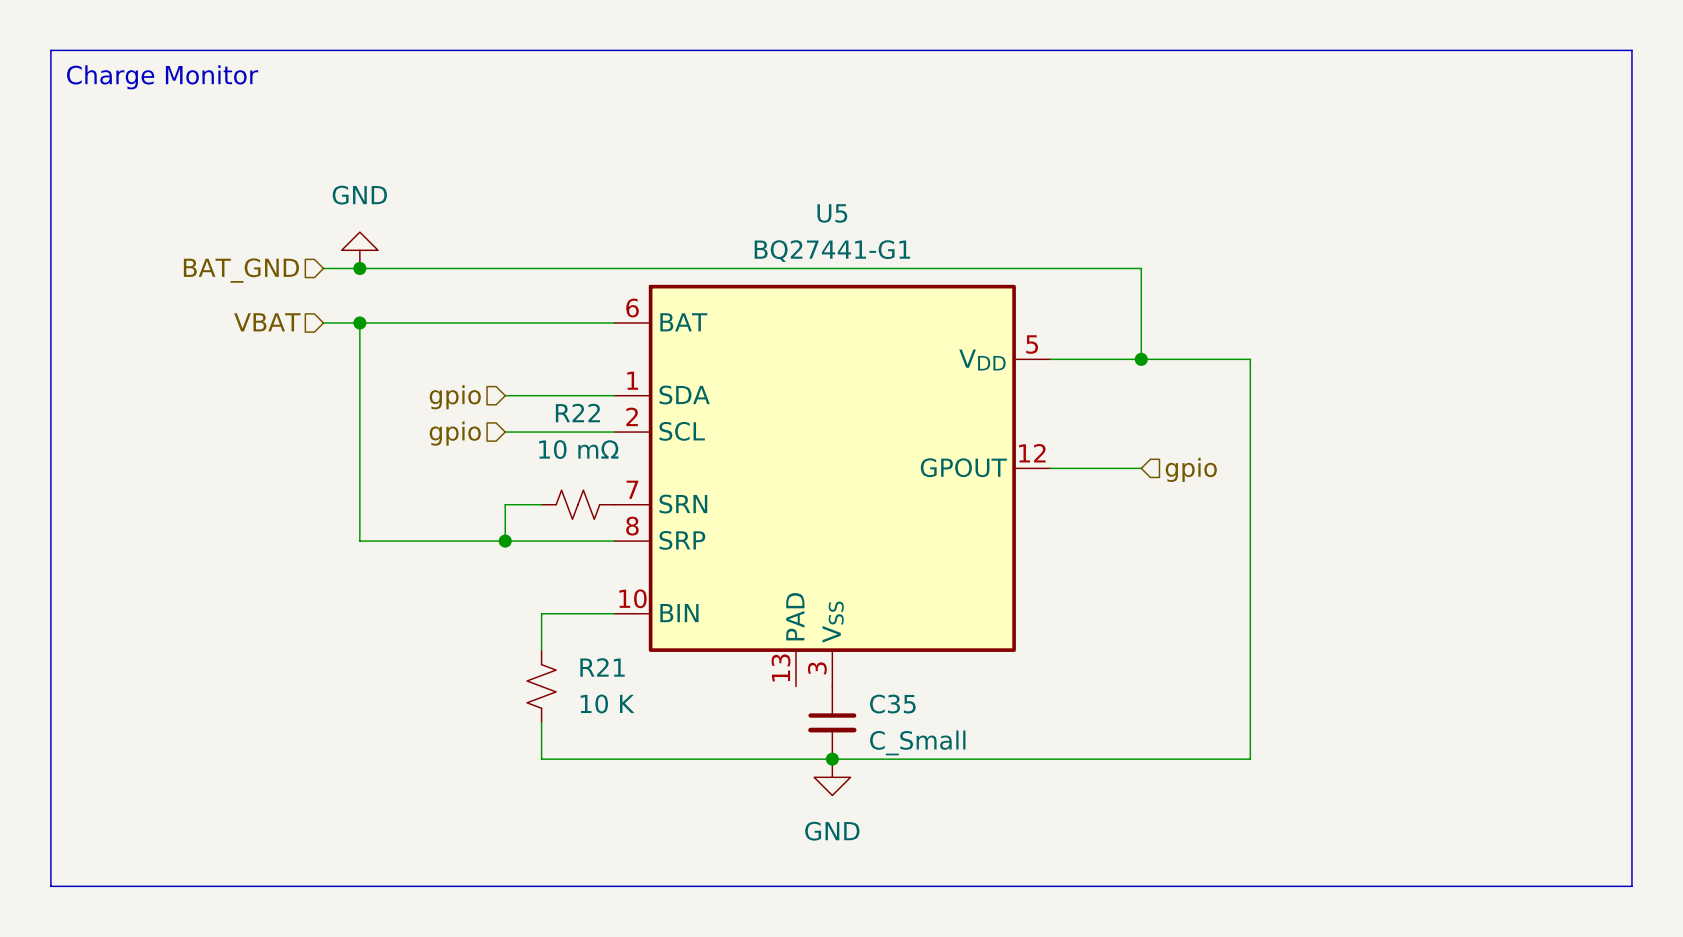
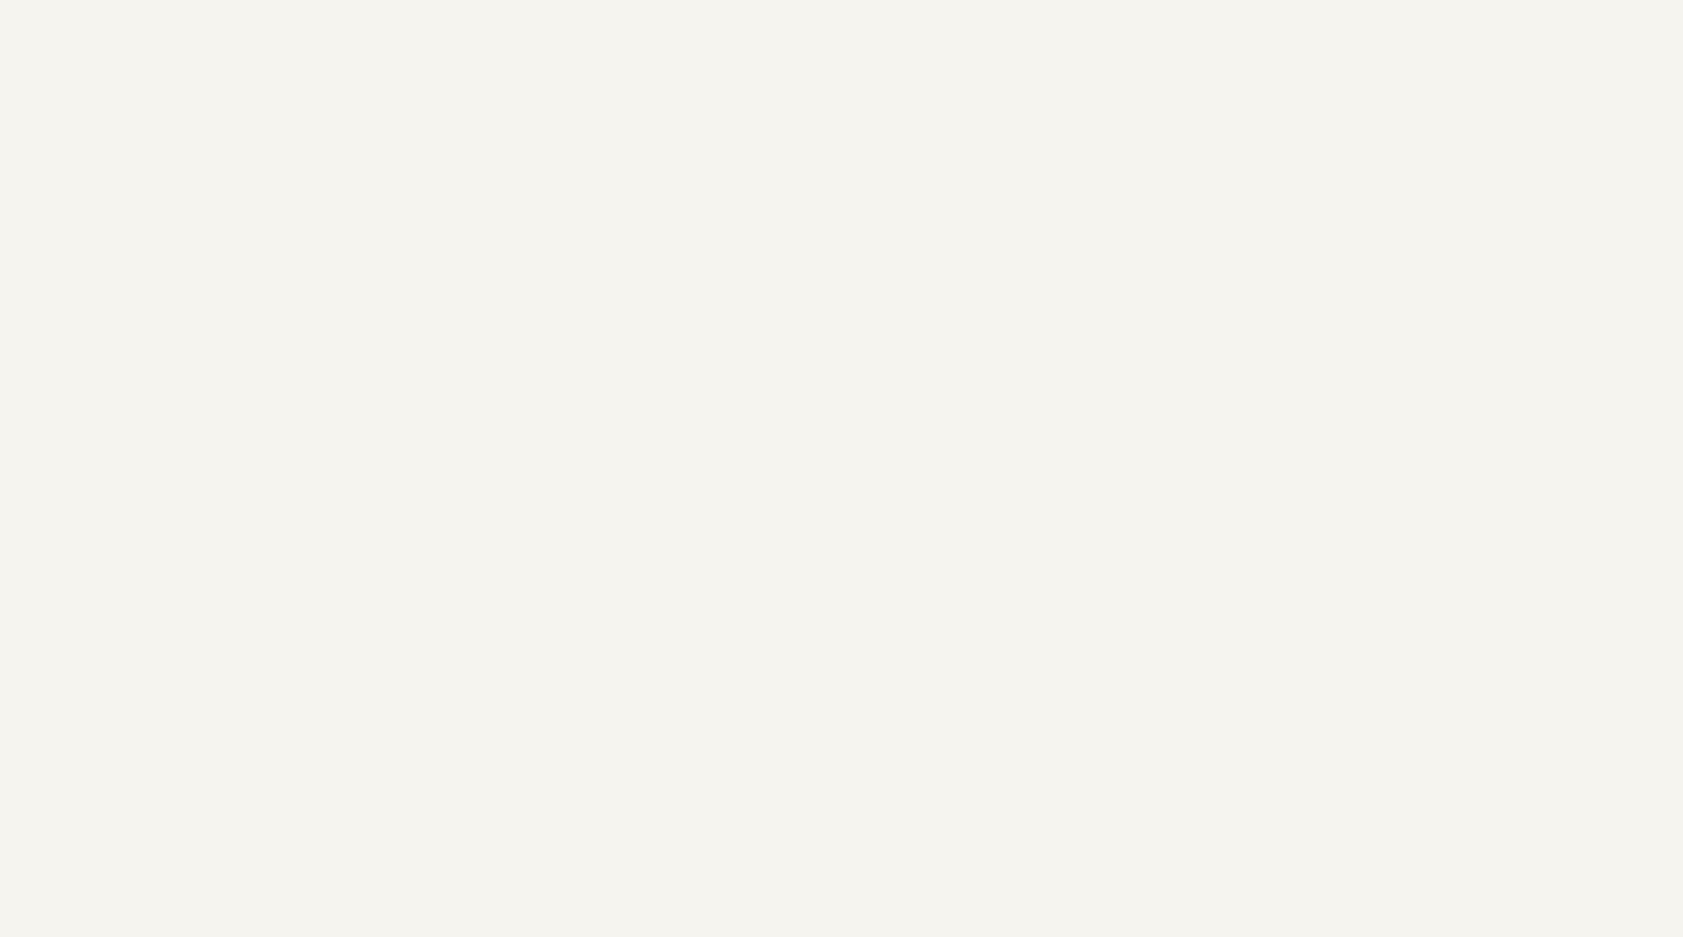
line: (50, 50) (1631, 50) (1631, 886) (50, 886) (50, 50) -> none
text: Charge Monitor (162, 77) -> none
power symbol: GND (359, 250) -> none
wire: (323, 268) (1141, 268) (1141, 359) -> none
junction: (359, 268) -> none
hierarchical label: BAT_GND (241, 270) -> none
hierarchical label: VBAT (267, 322) -> none
wire: (323, 323) (614, 323) -> none
wire: (359, 323) (359, 541) (614, 541) -> none
junction: (359, 323) -> none
wire: (1050, 359) (1250, 359) (1250, 759) (541, 759) (541, 722) -> none
junction: (1141, 359) -> none
wire: (505, 395) (614, 395) -> none
hierarchical label: gpio (455, 397) -> none
wire: (505, 432) (614, 432) -> none
hierarchical label: gpio (455, 433) -> none
wire: (1050, 468) (1141, 468) -> none
hierarchical label: gpio (1191, 469) -> none
U5: BQ27441-G1 (832, 485) -> none
wire: (541, 504) (505, 504) (505, 541) -> none
R22: 10 mΩ (577, 504) -> none
junction: (505, 541) -> none
wire: (614, 613) (541, 613) (541, 650) -> none
R21: 10 K (541, 686) -> none
C35: C_Small (832, 722) -> none
junction: (832, 759) -> none
power symbol: GND (832, 777) -> none

